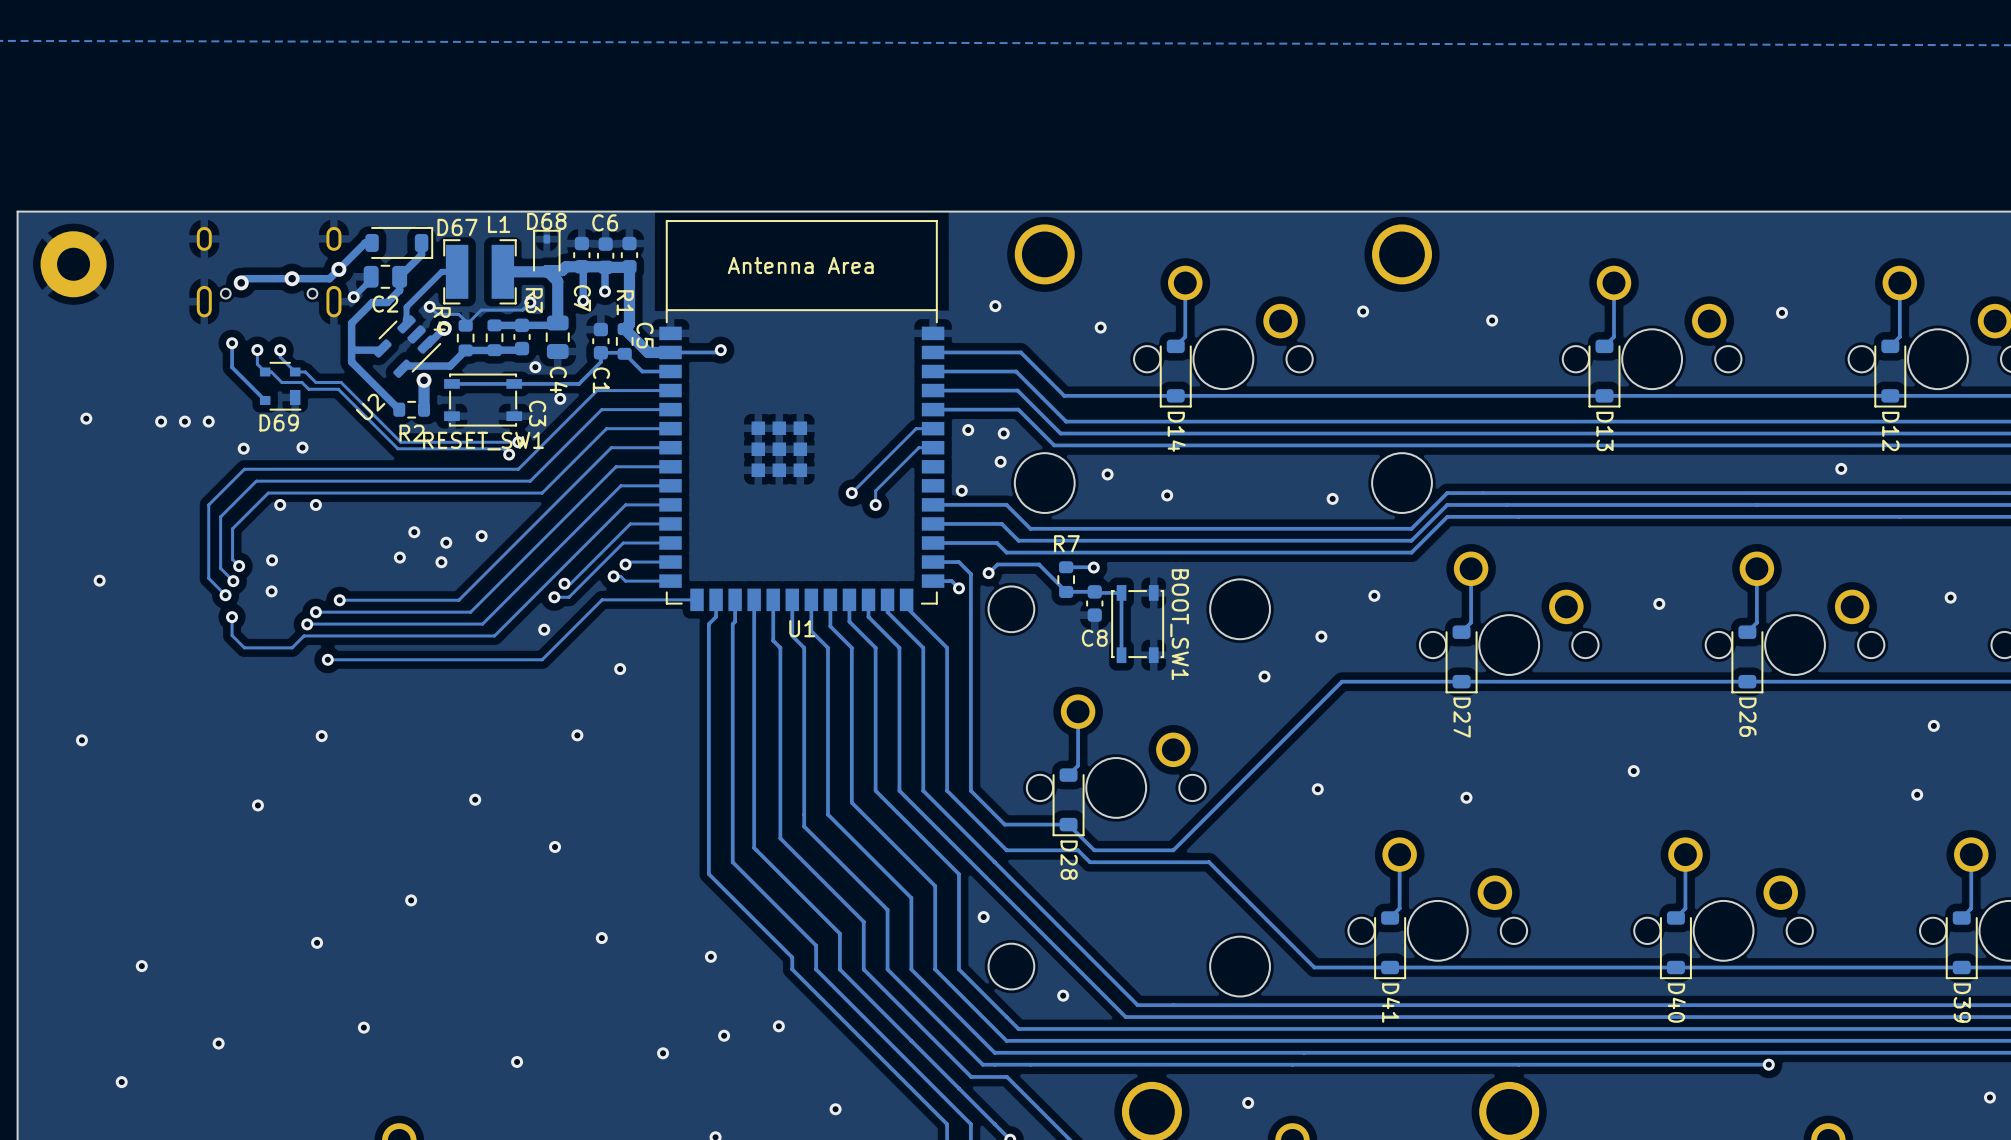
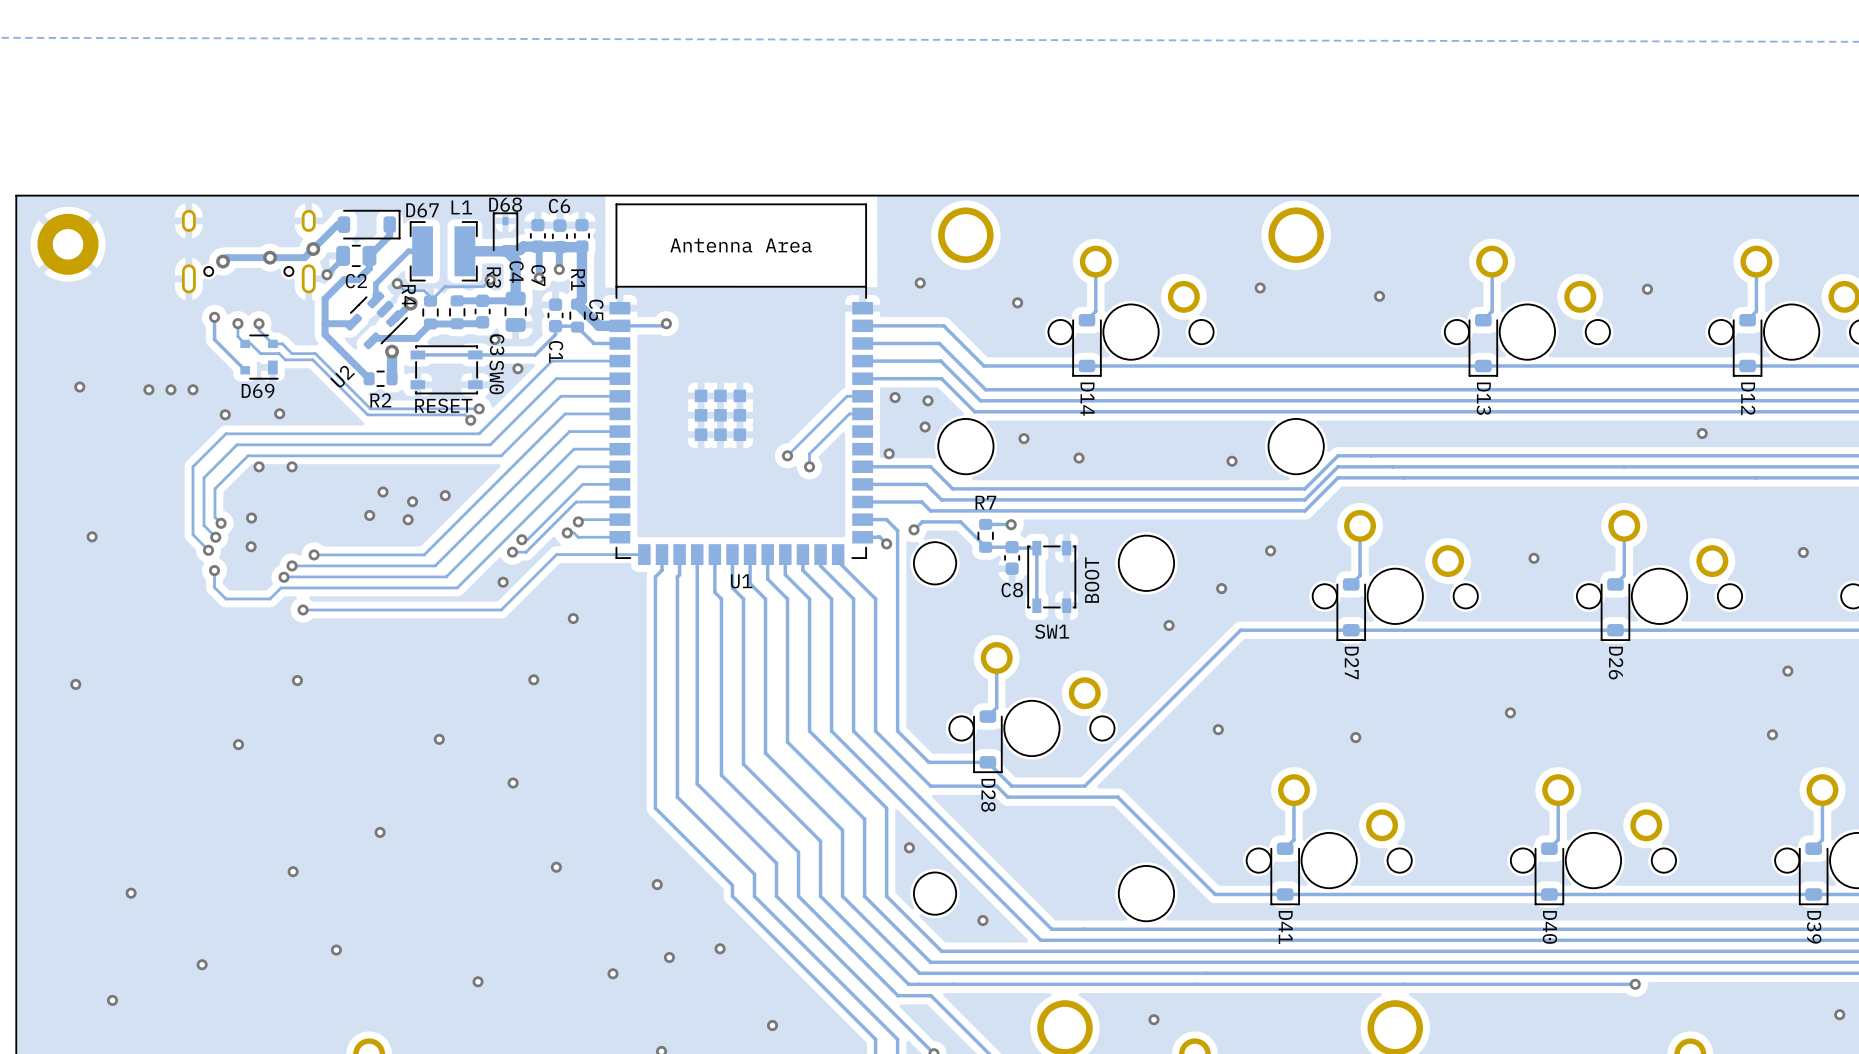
C4 name position: C4 (558, 380) -> C4 (516, 272)
C3 name position: C3 (537, 413) -> C3 (497, 344)
text: none -> RESET (443, 405)
RESET_SW1 name: RESET_SW1 (483, 441) -> SW0 (496, 377)
text: none -> BOOT (1092, 580)
BOOT_SW1 name: BOOT_SW1 (1179, 624) -> SW1 (1052, 631)

